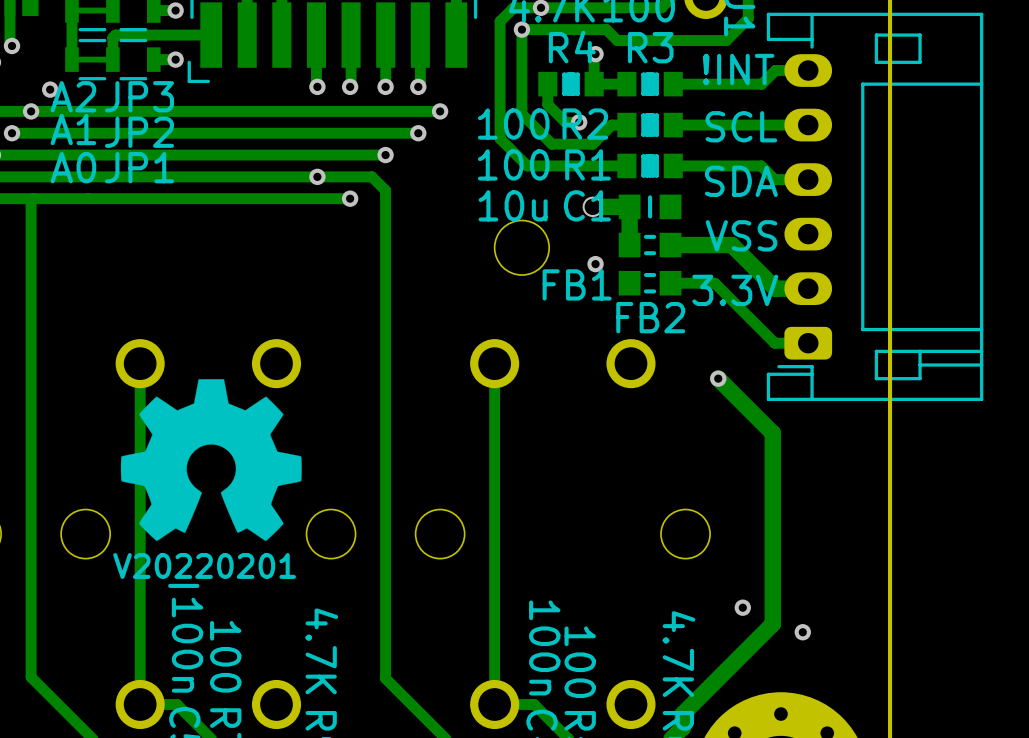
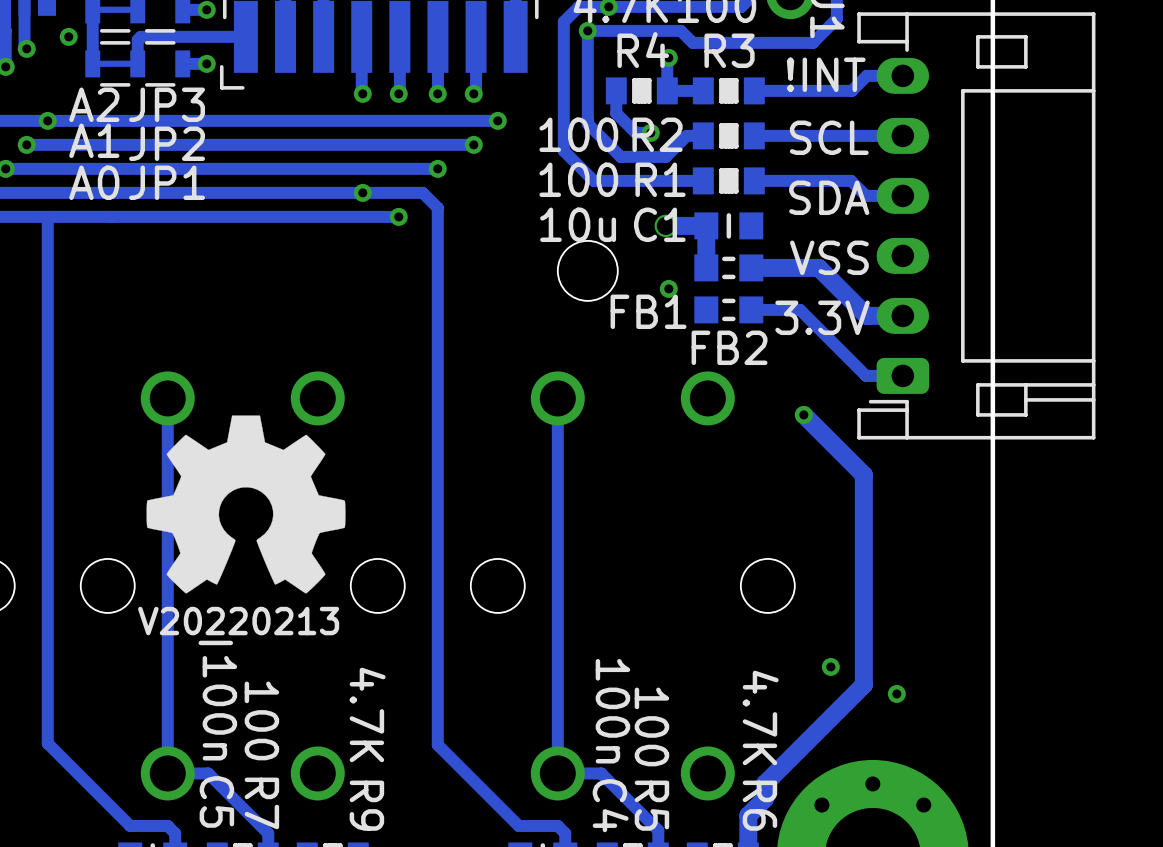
via position: (50, 89) -> (68, 36)
drawing shape: [113, 553, 296, 588] -> [138, 606, 340, 646]

